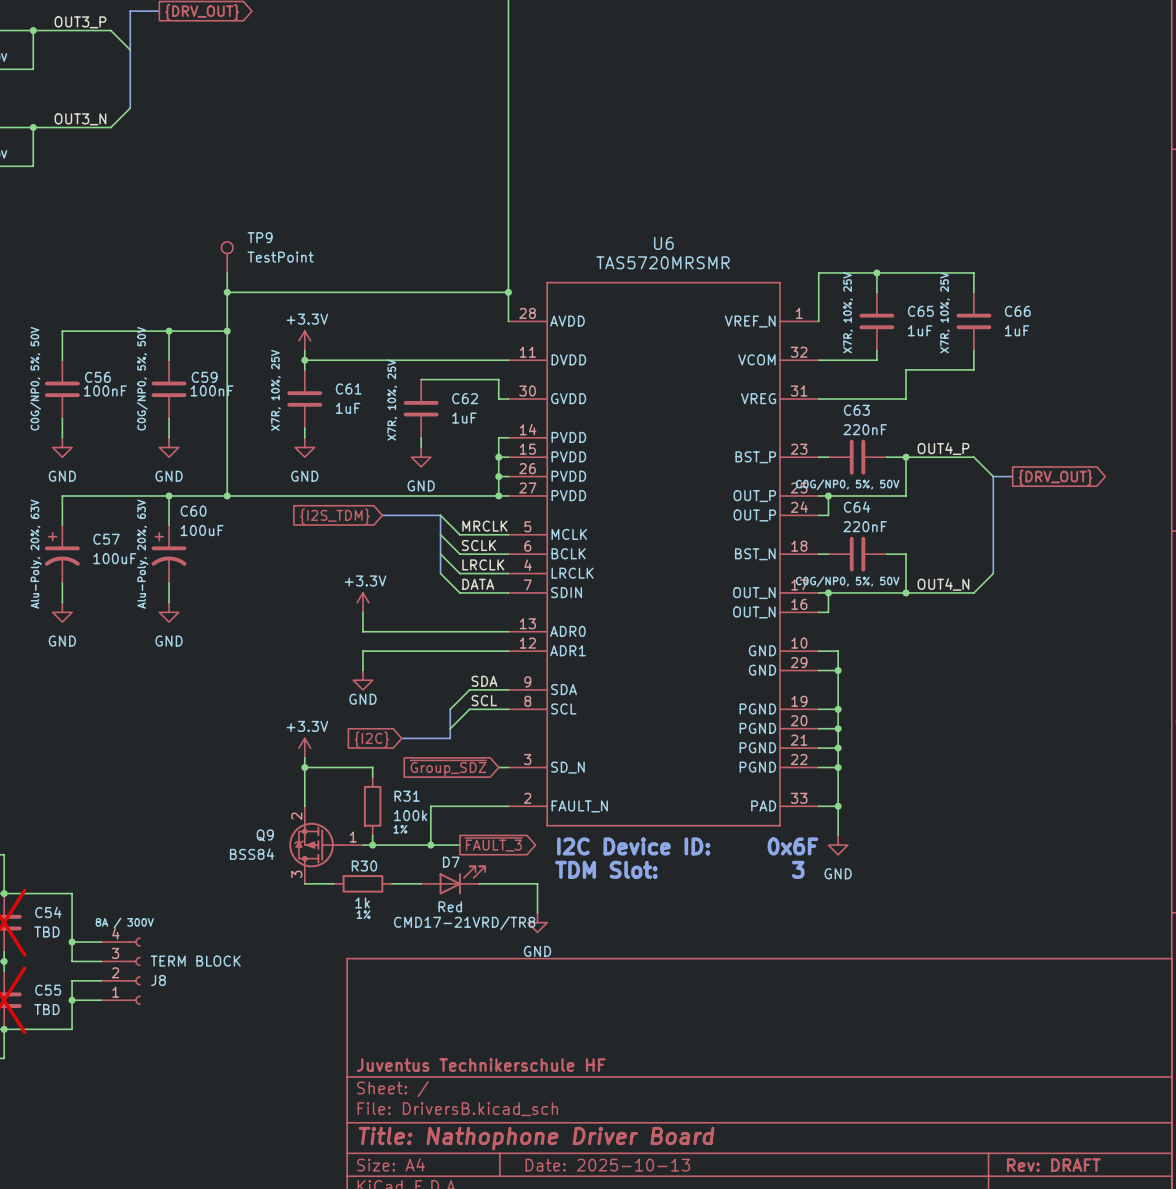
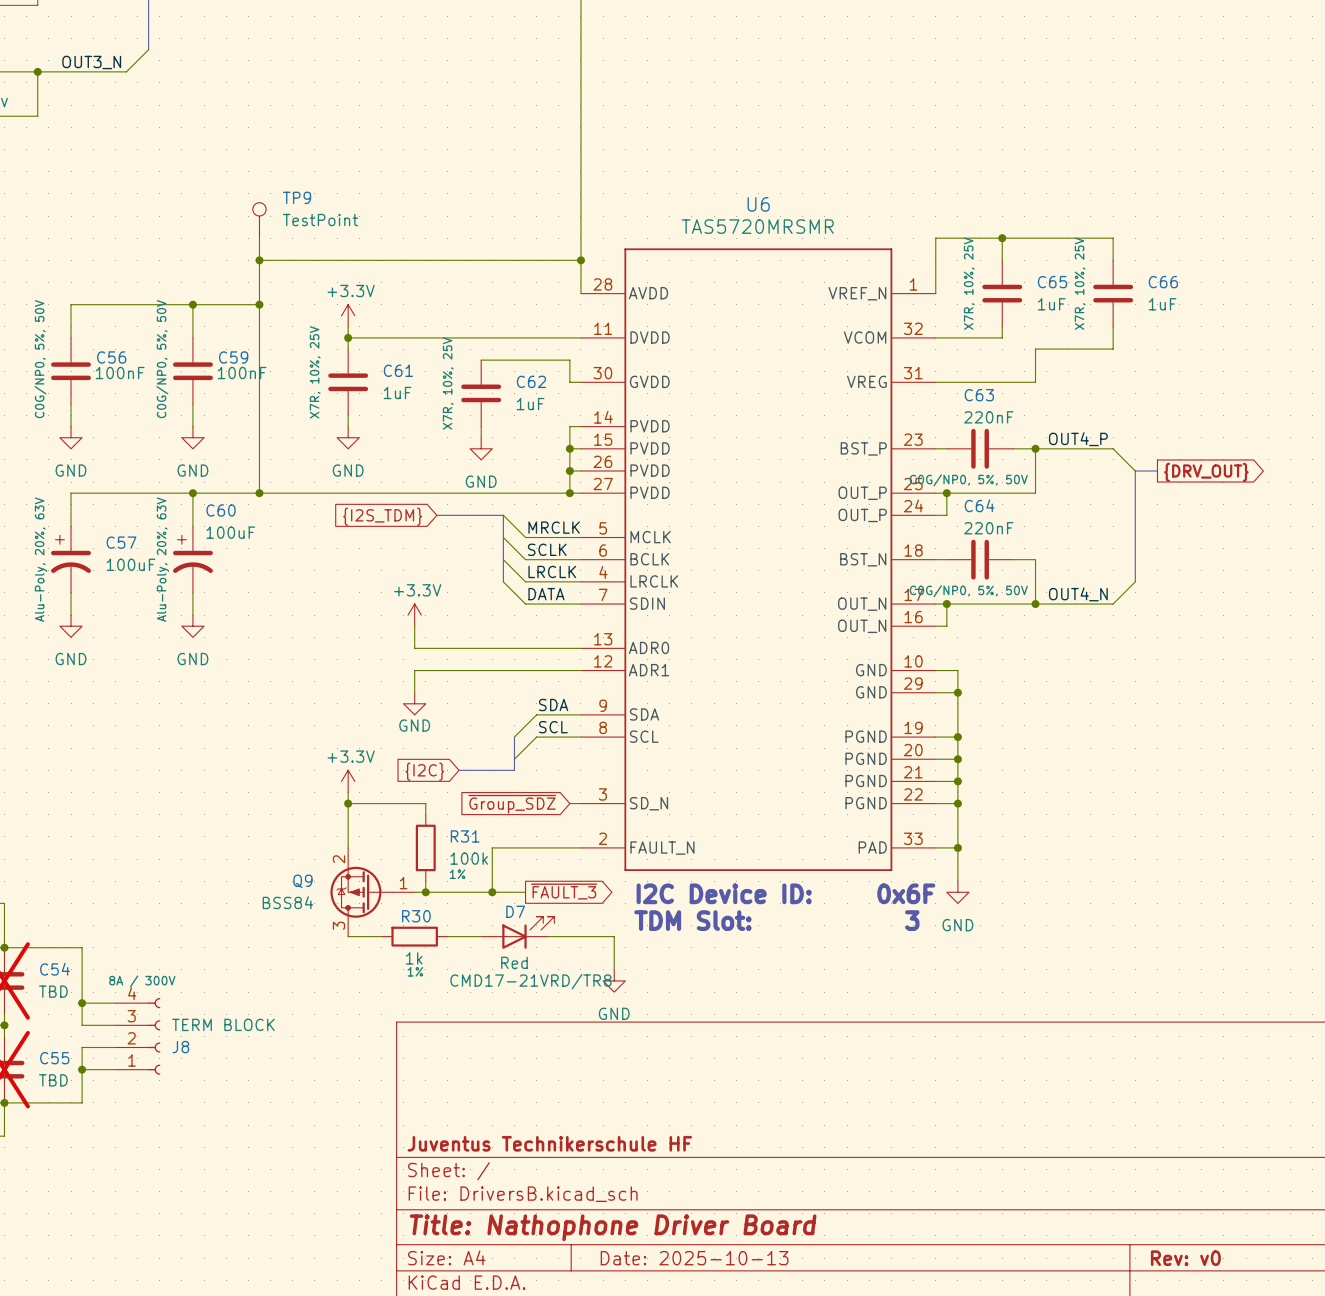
title block: Rev: DRAFT (1053, 1165) -> Rev: v0 (1185, 1258)

